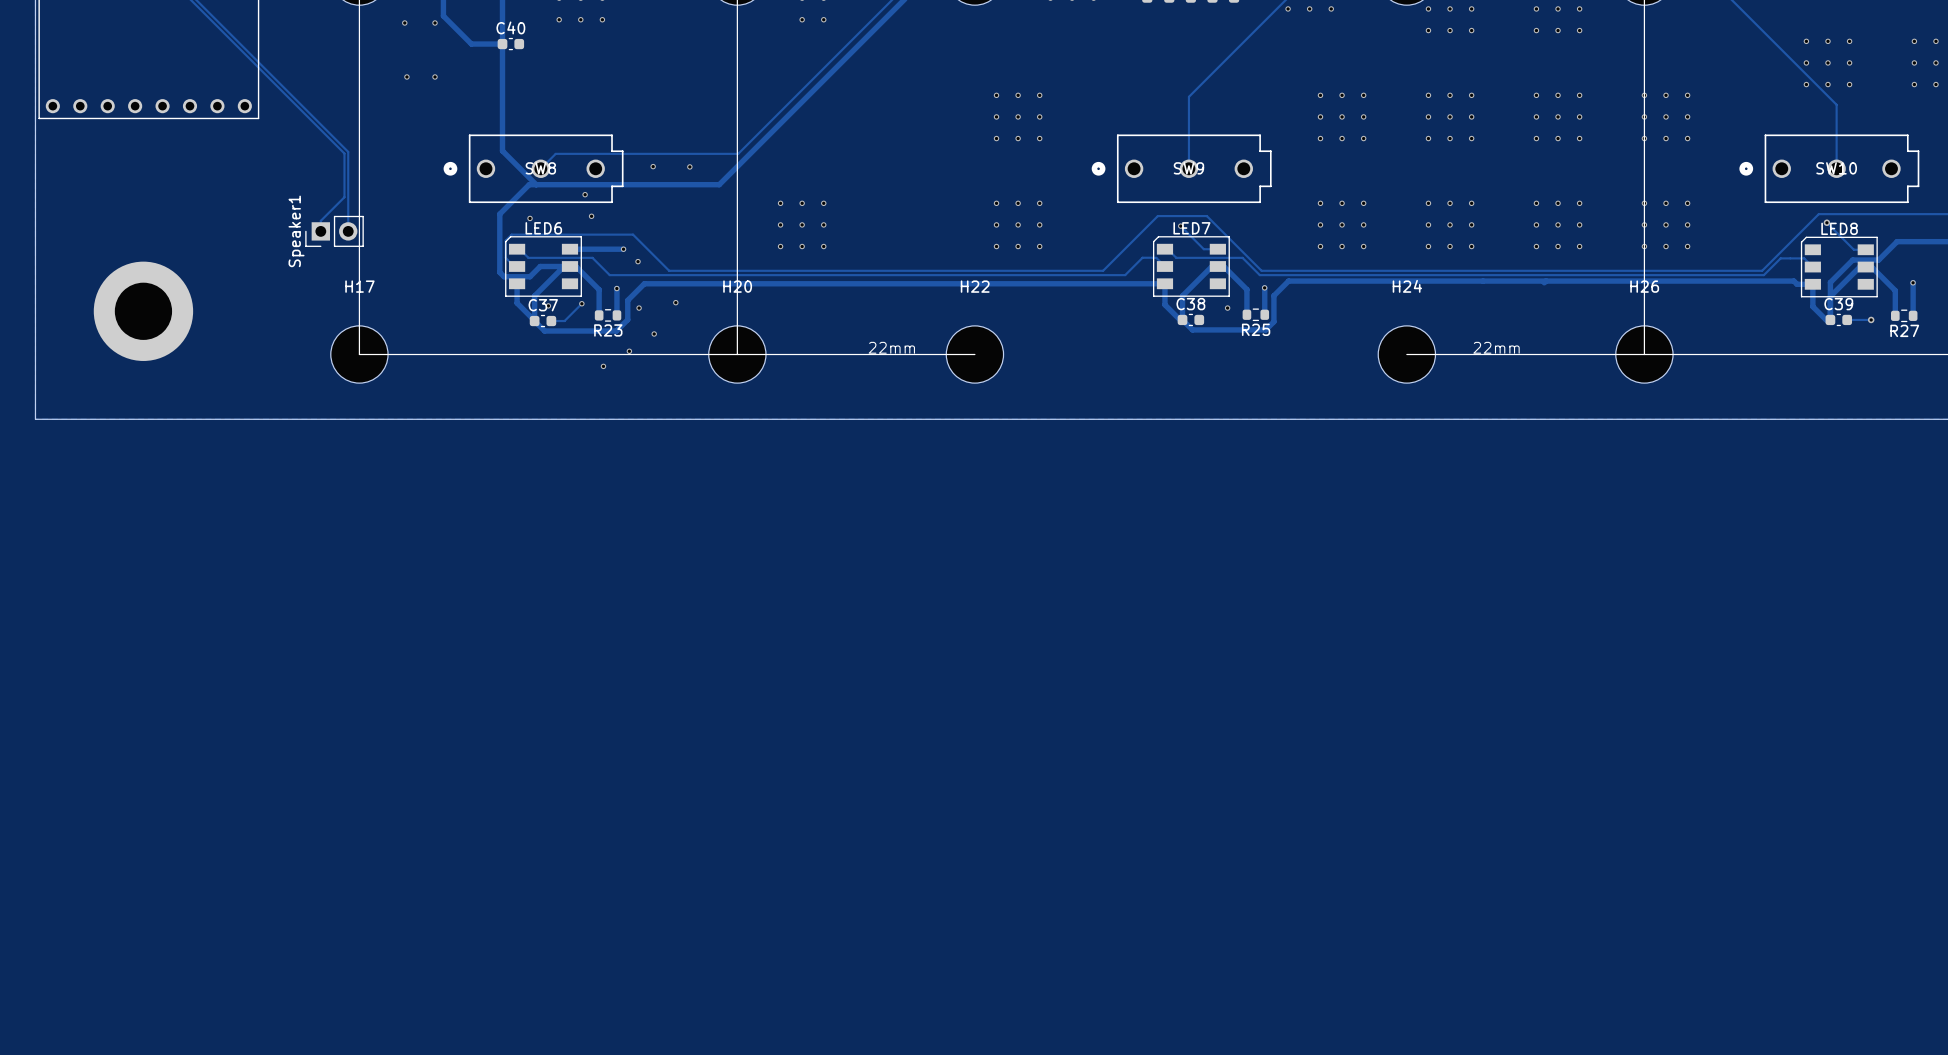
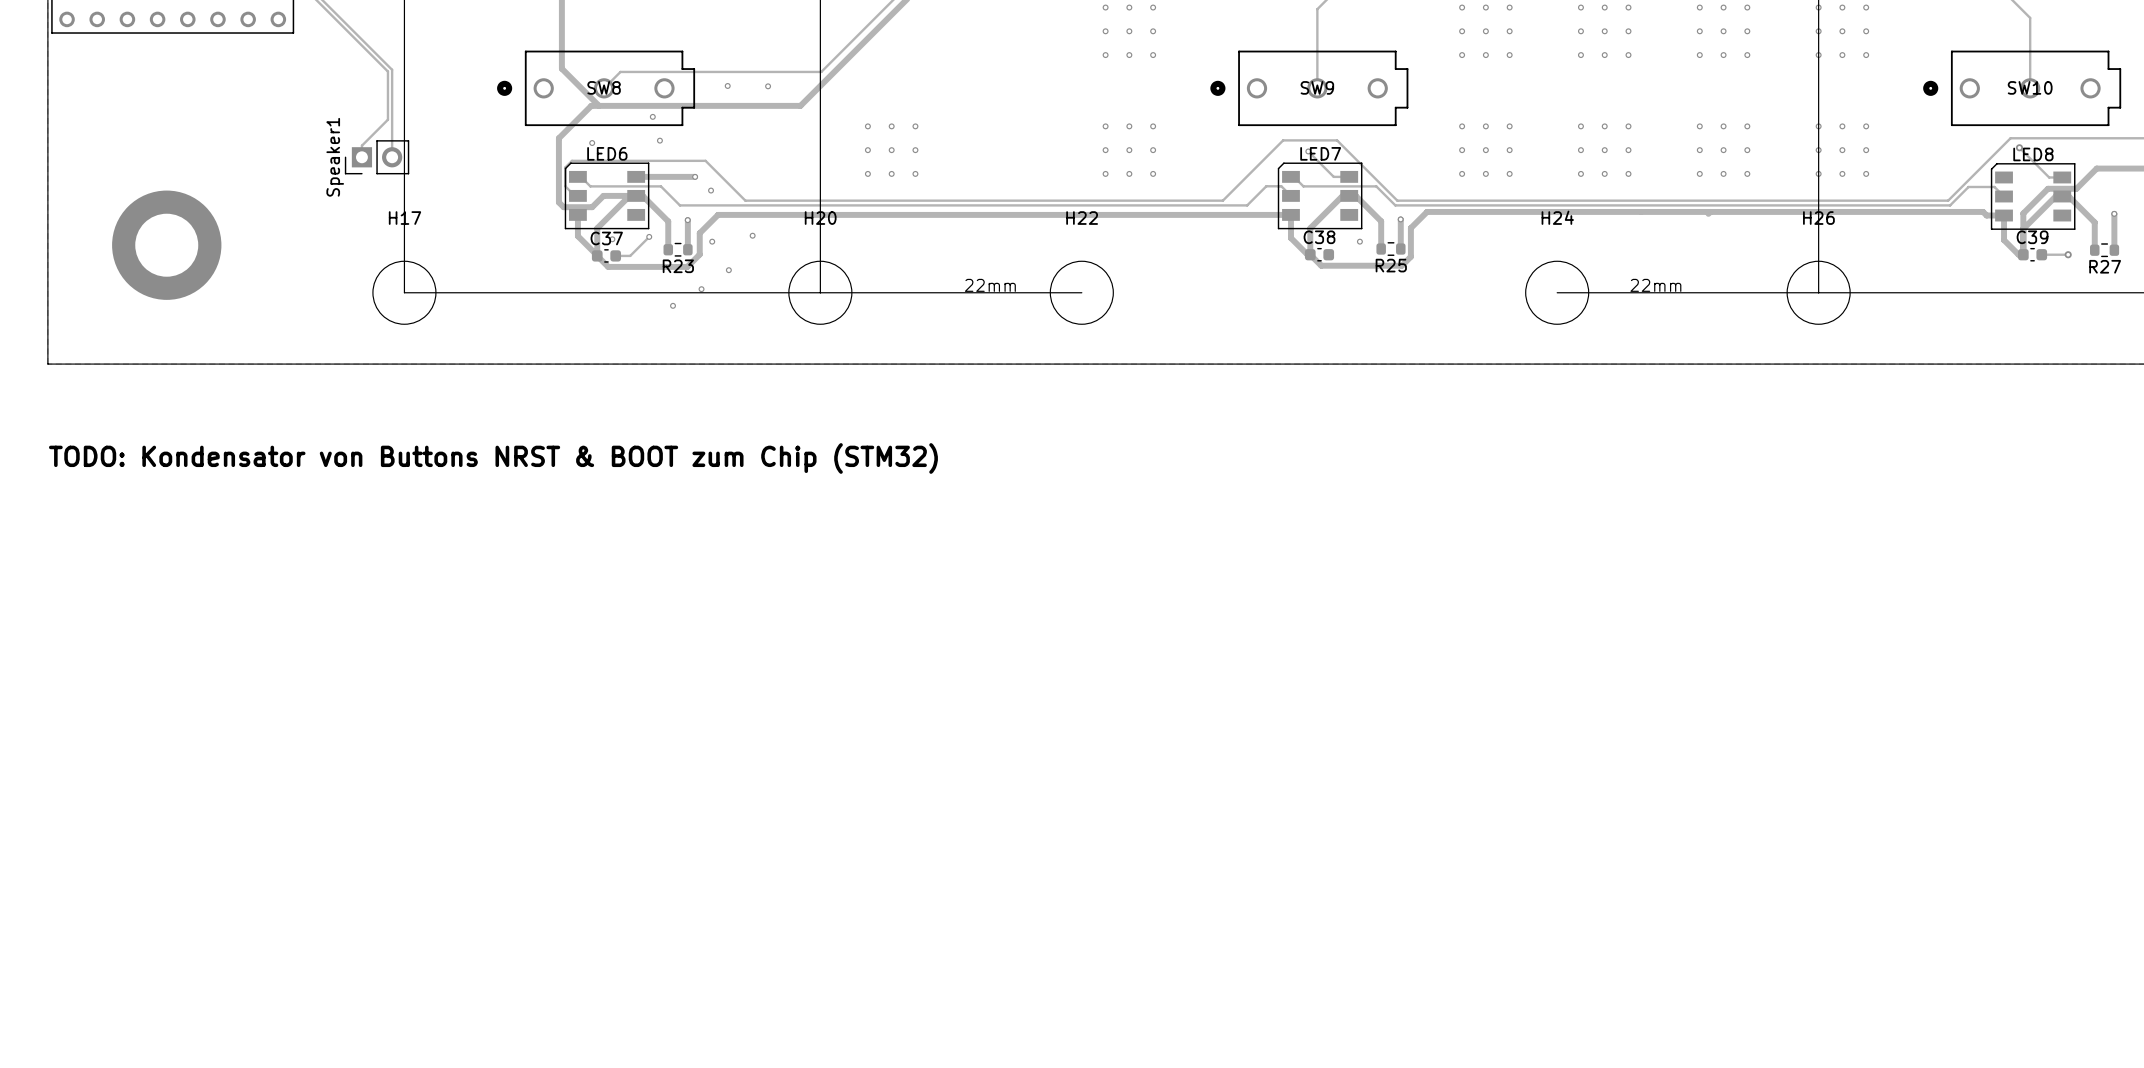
text: none -> TODO: Kondensator von Buttons NRST & BOOT zum Chip (STM32) (493, 458)

